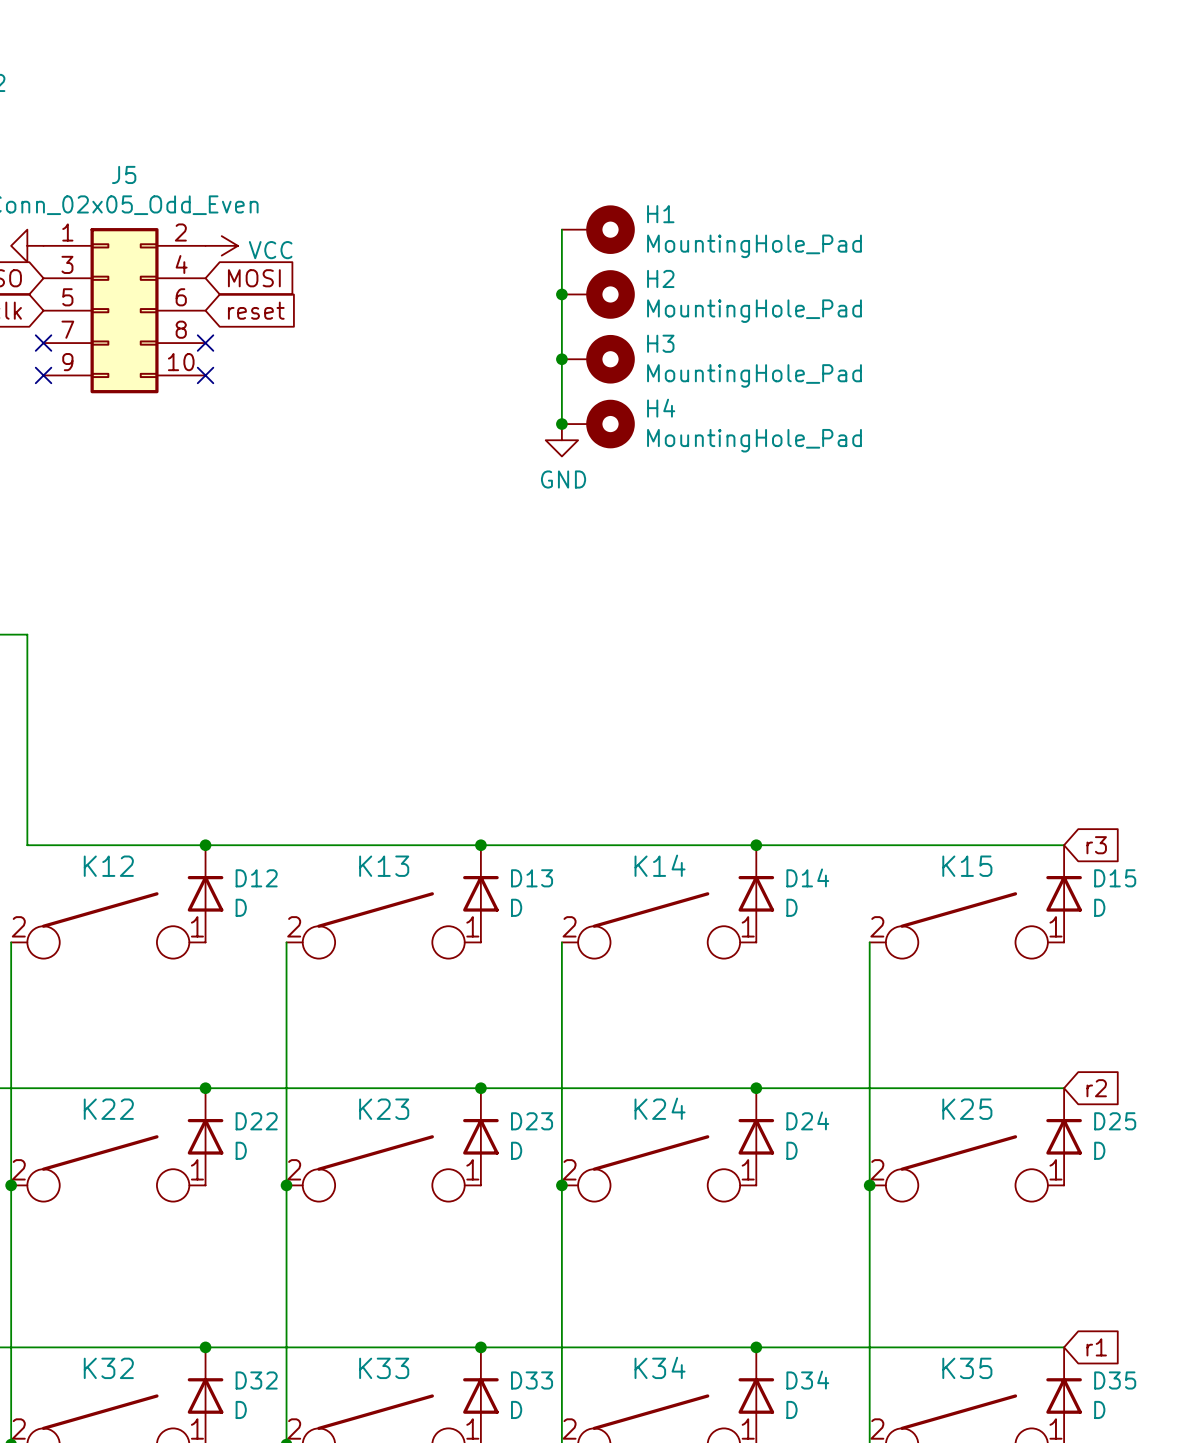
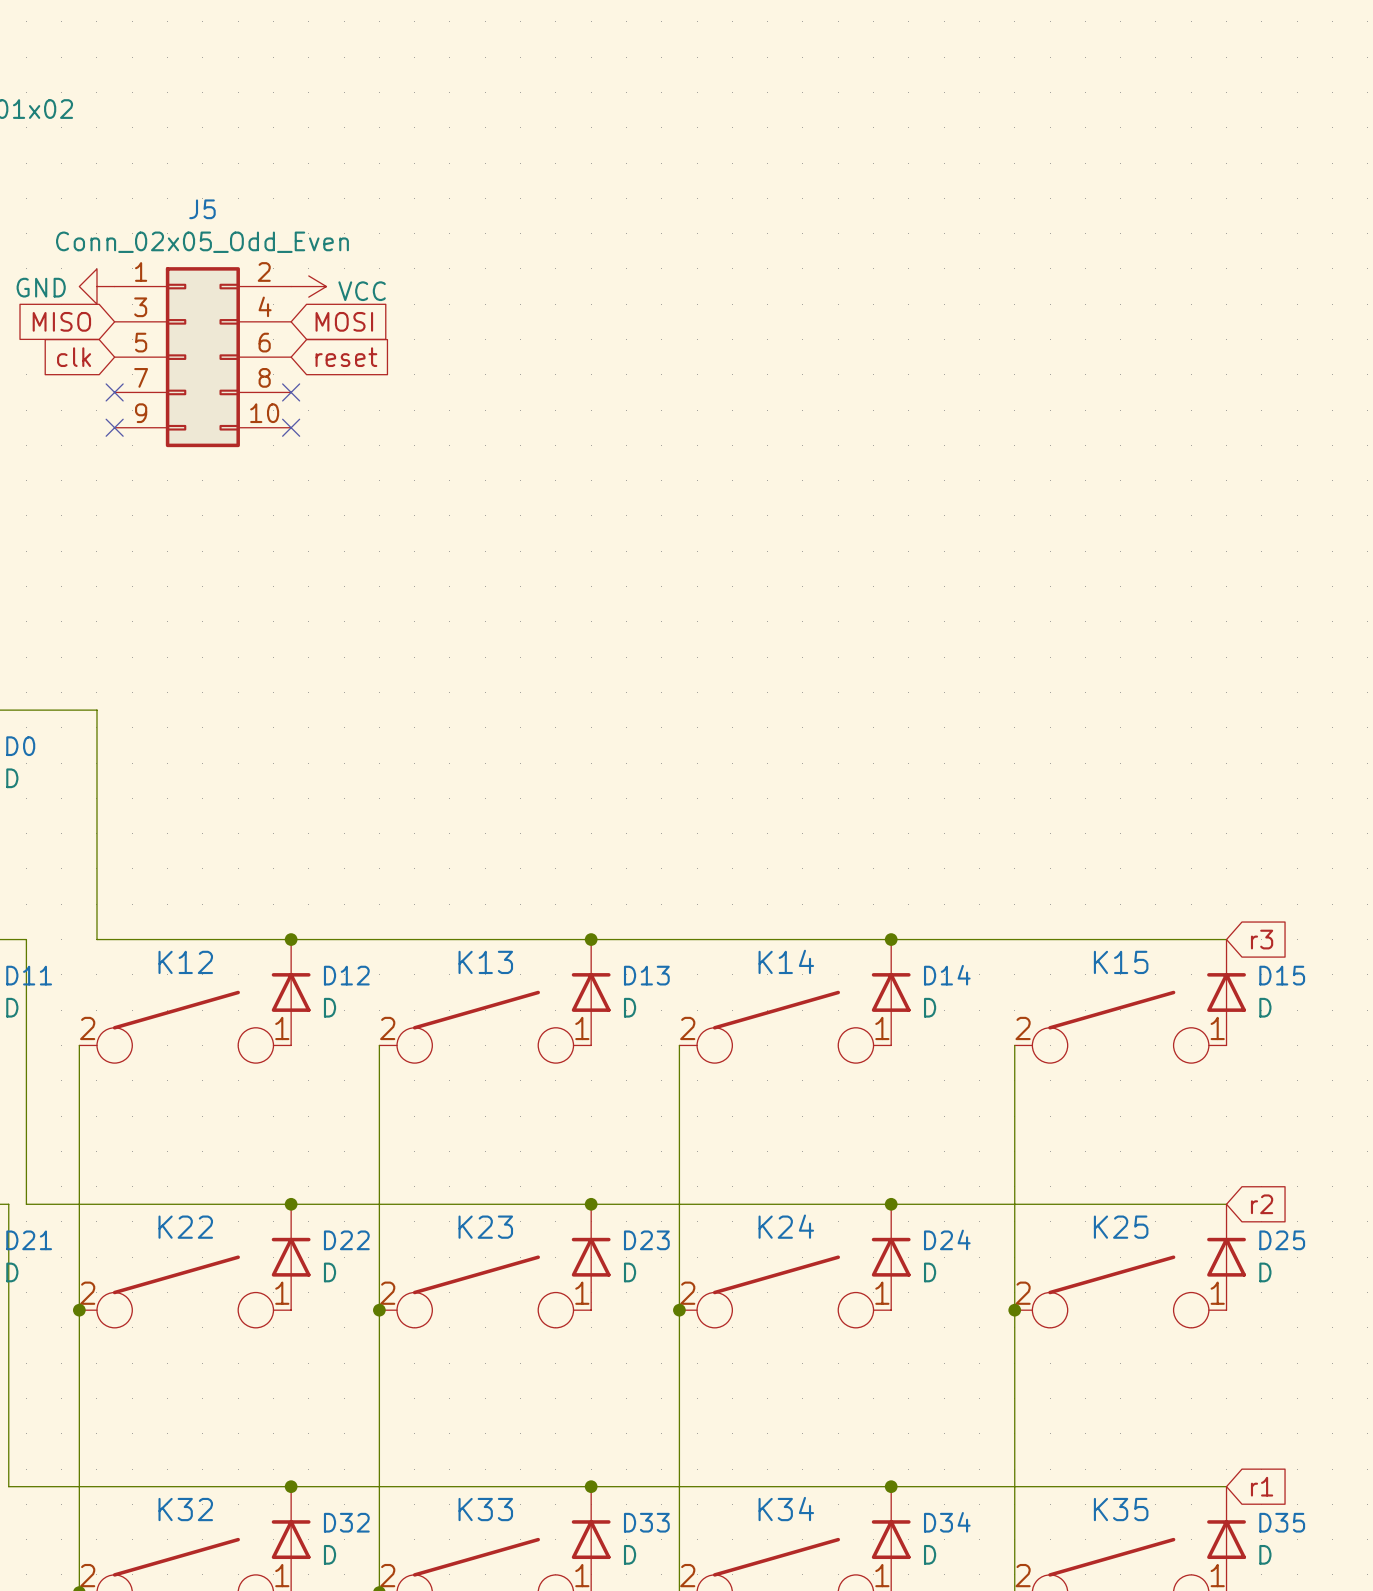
wire: (561, 229) (561, 424) -> none
H1: MountingHole_Pad (598, 229) -> none
junction: (561, 294) -> none
H2: MountingHole_Pad (598, 294) -> none
junction: (561, 359) -> none
H3: MountingHole_Pad (598, 359) -> none
junction: (561, 424) -> none
H4: MountingHole_Pad (598, 424) -> none
power symbol: GND (561, 440) -> none

